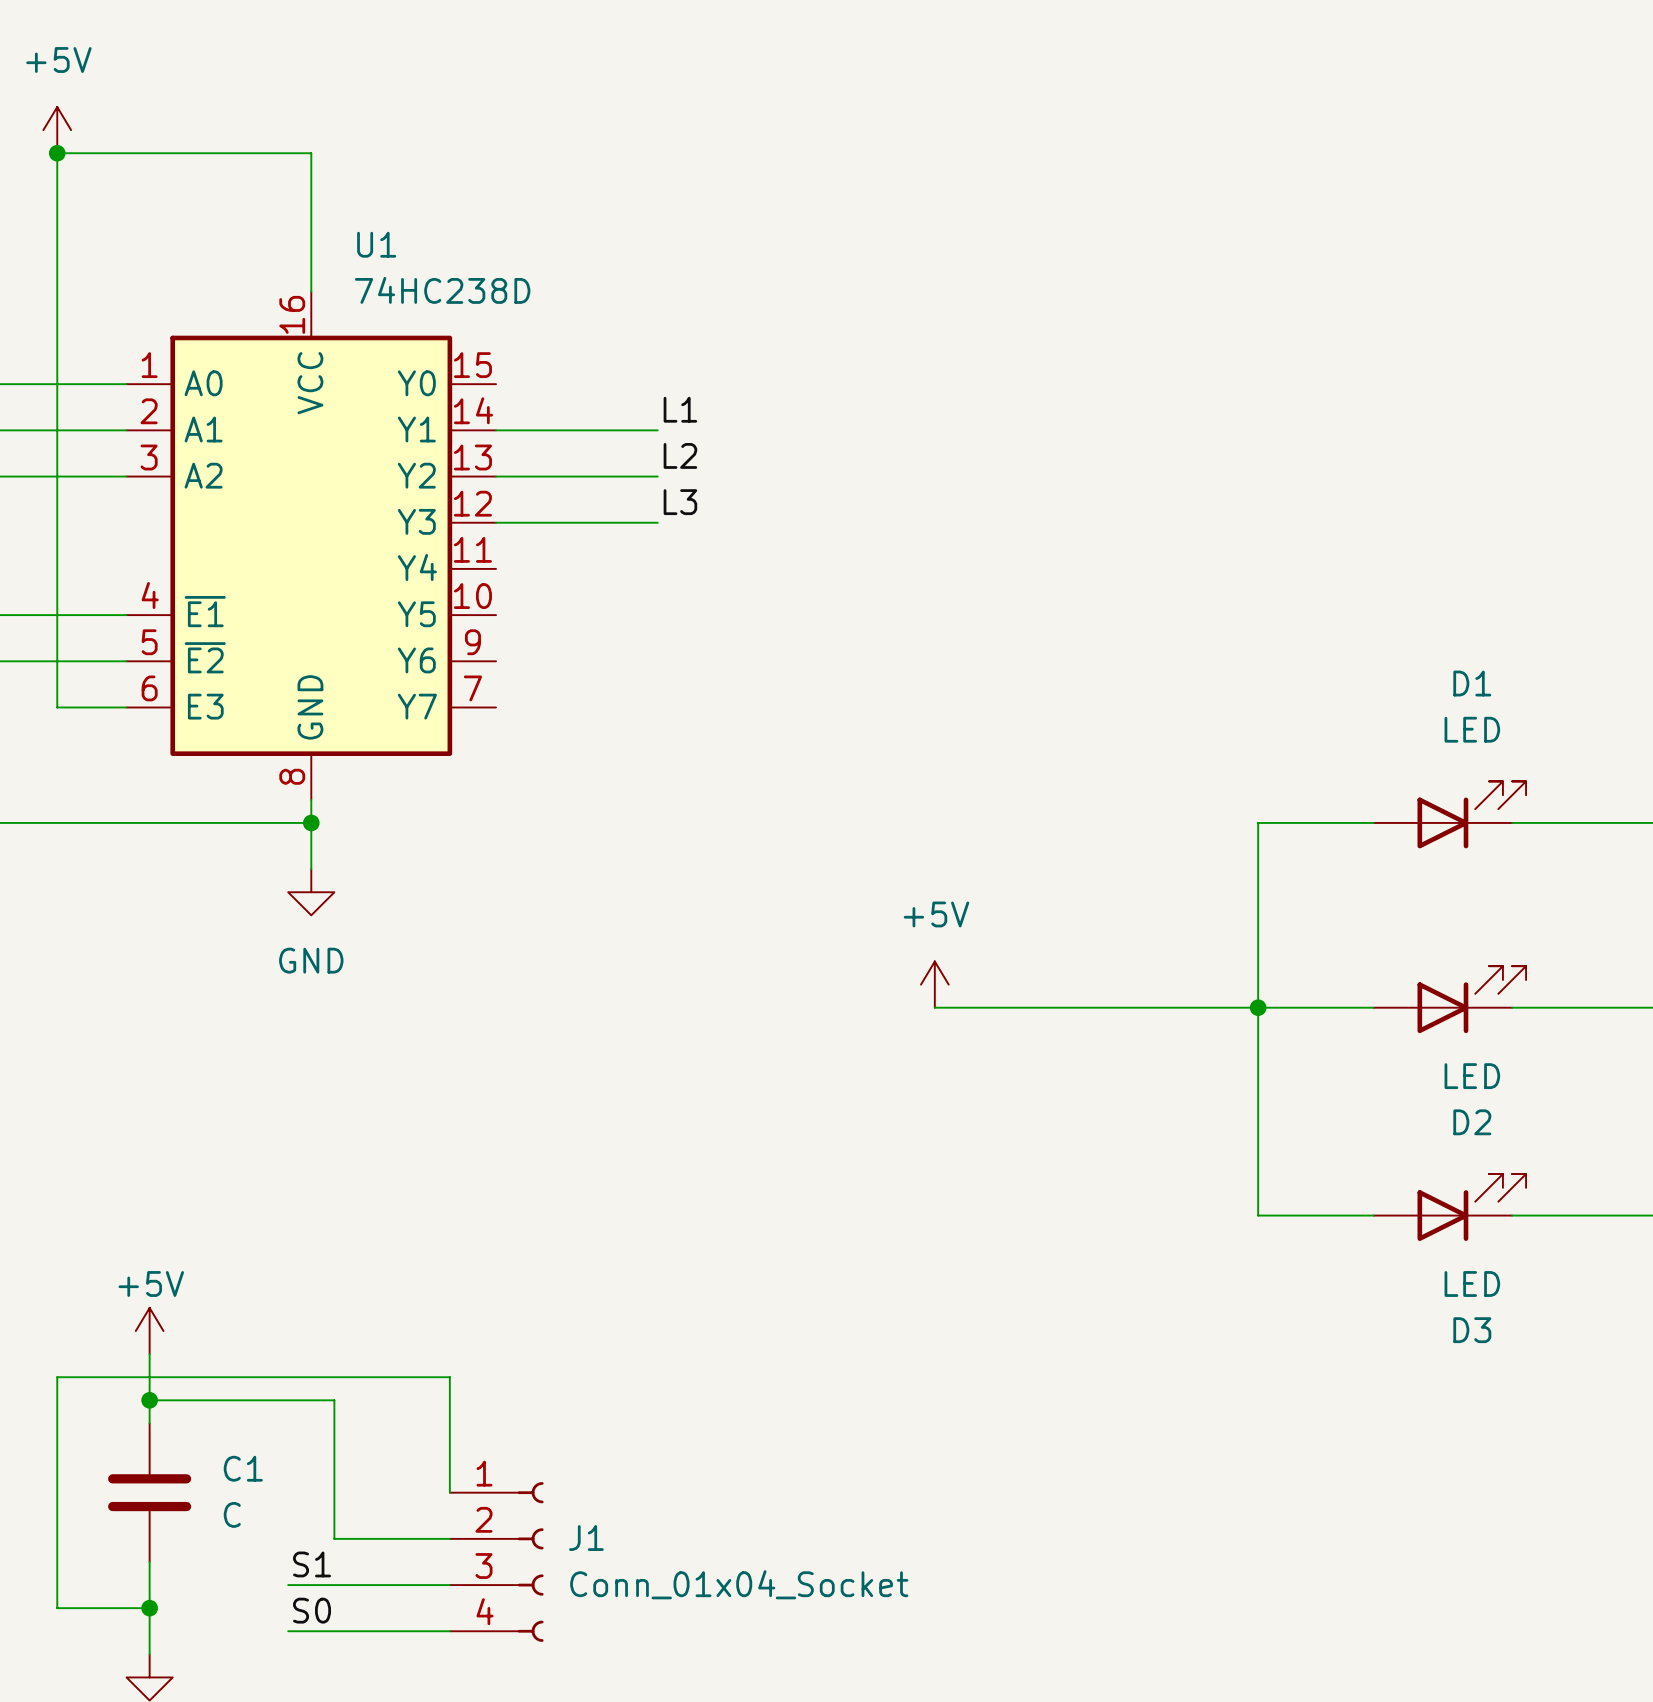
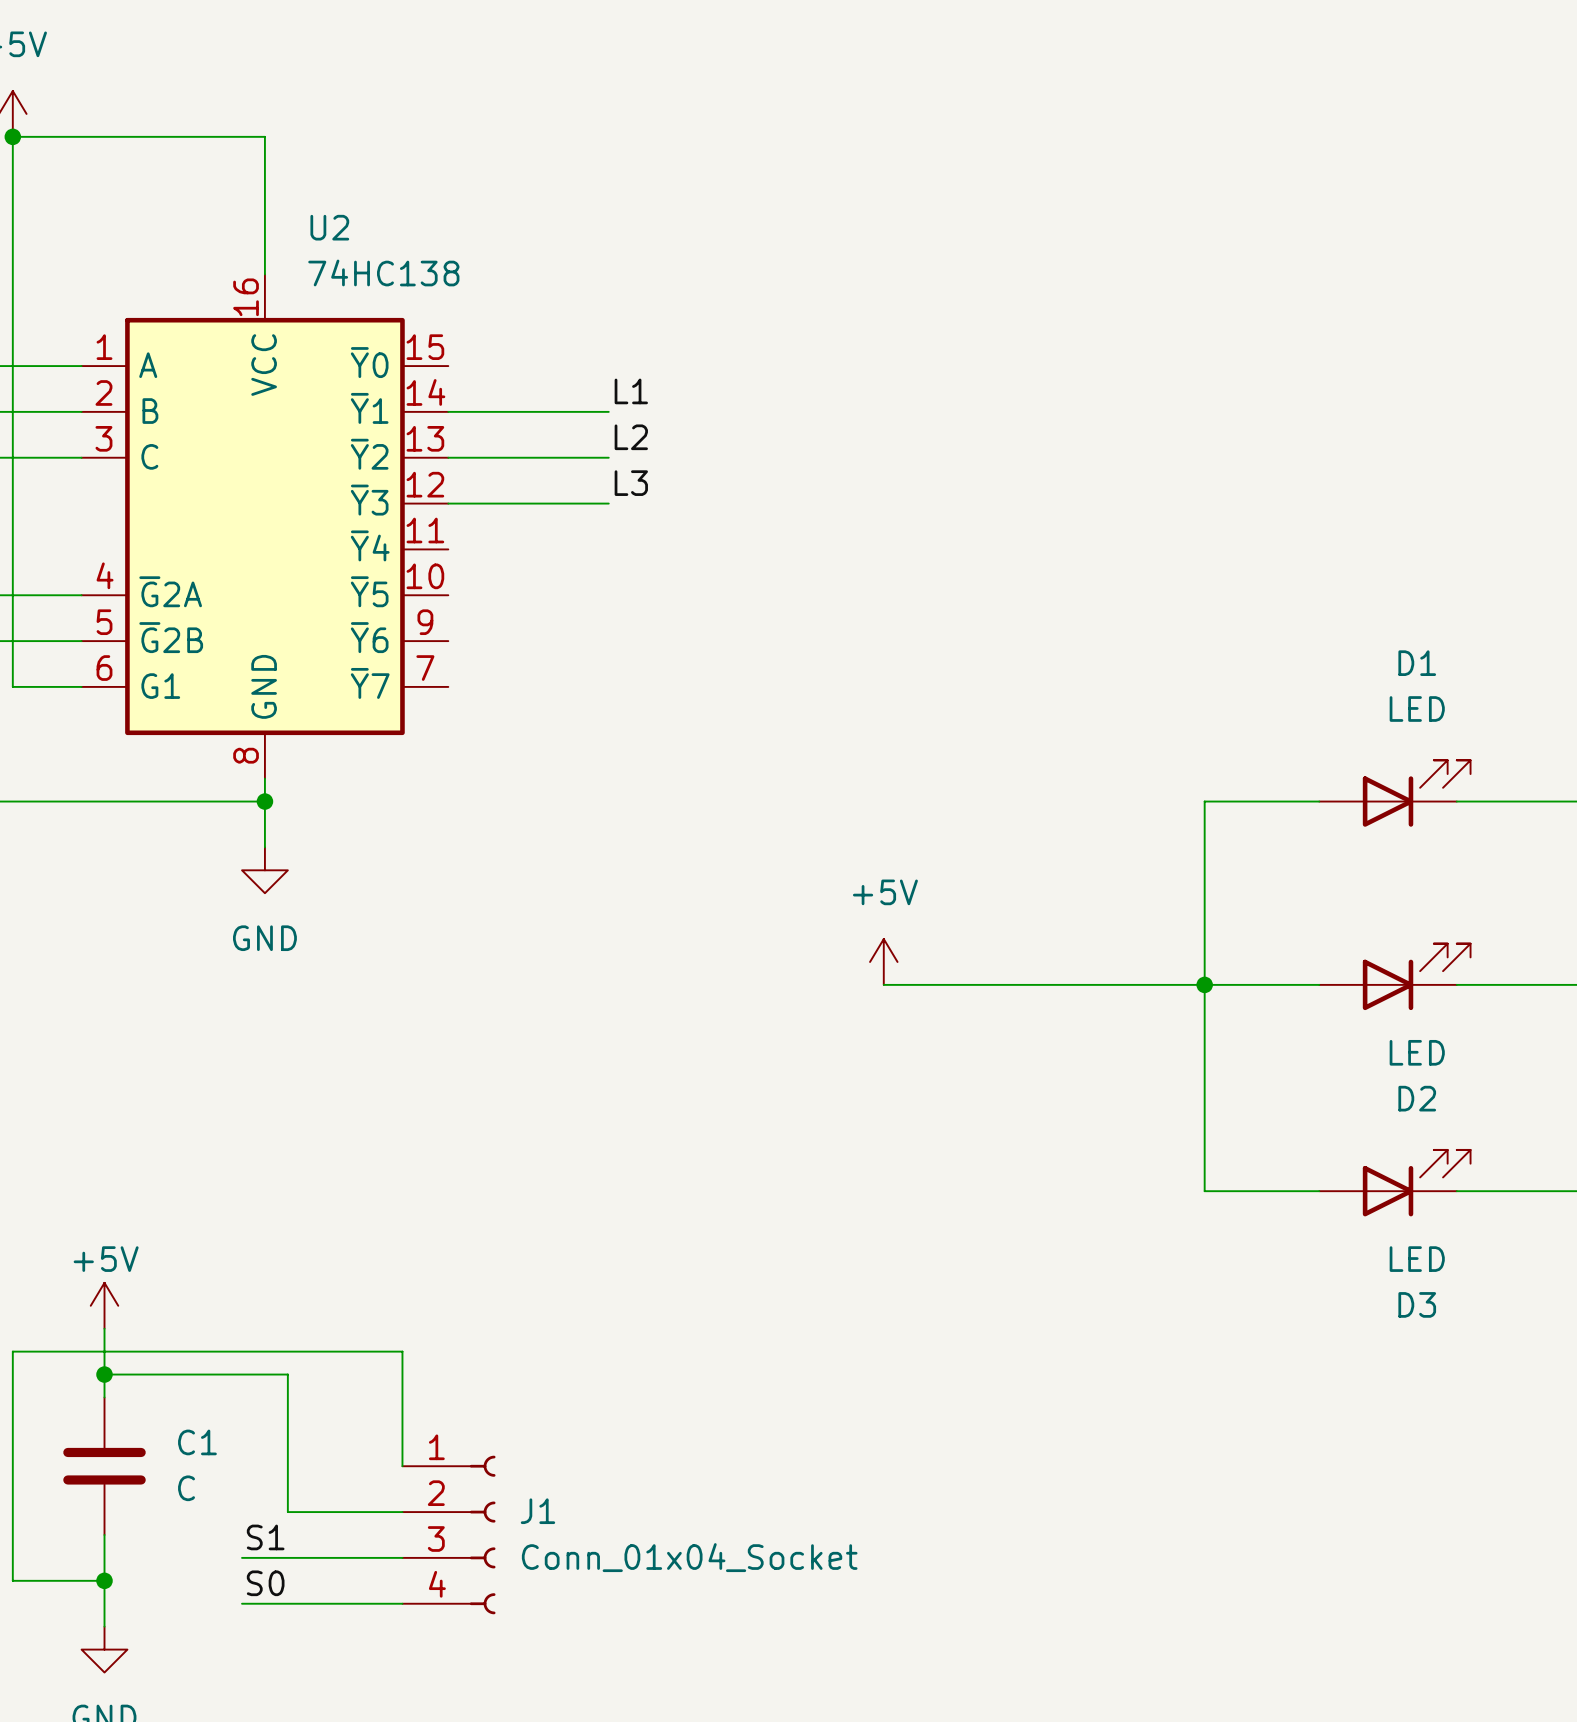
U1 name: U1 (376, 244) -> U2 (329, 227)
U1 value: 74HC238D (442, 290) -> 74HC138 (383, 272)
U1 symbol: [126, 291, 497, 800] -> [81, 274, 449, 779]

